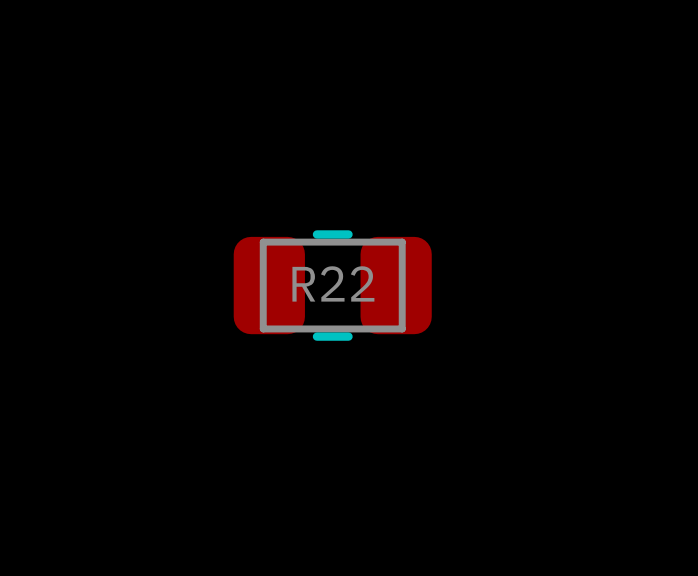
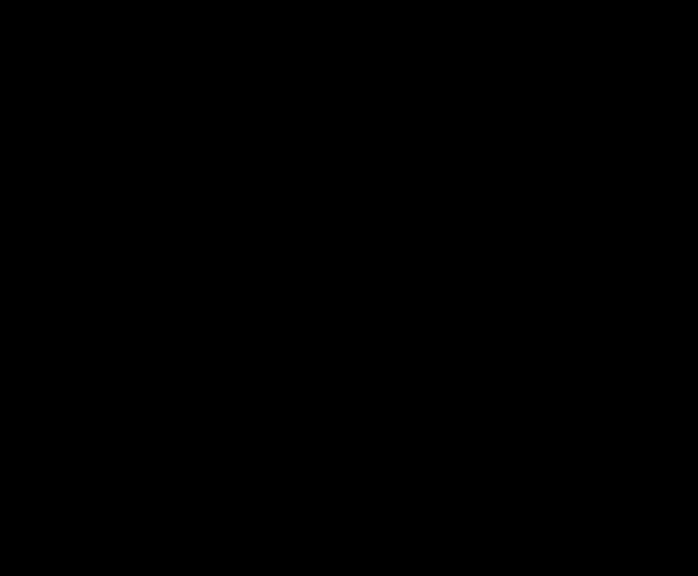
R22: (332, 285) -> none

